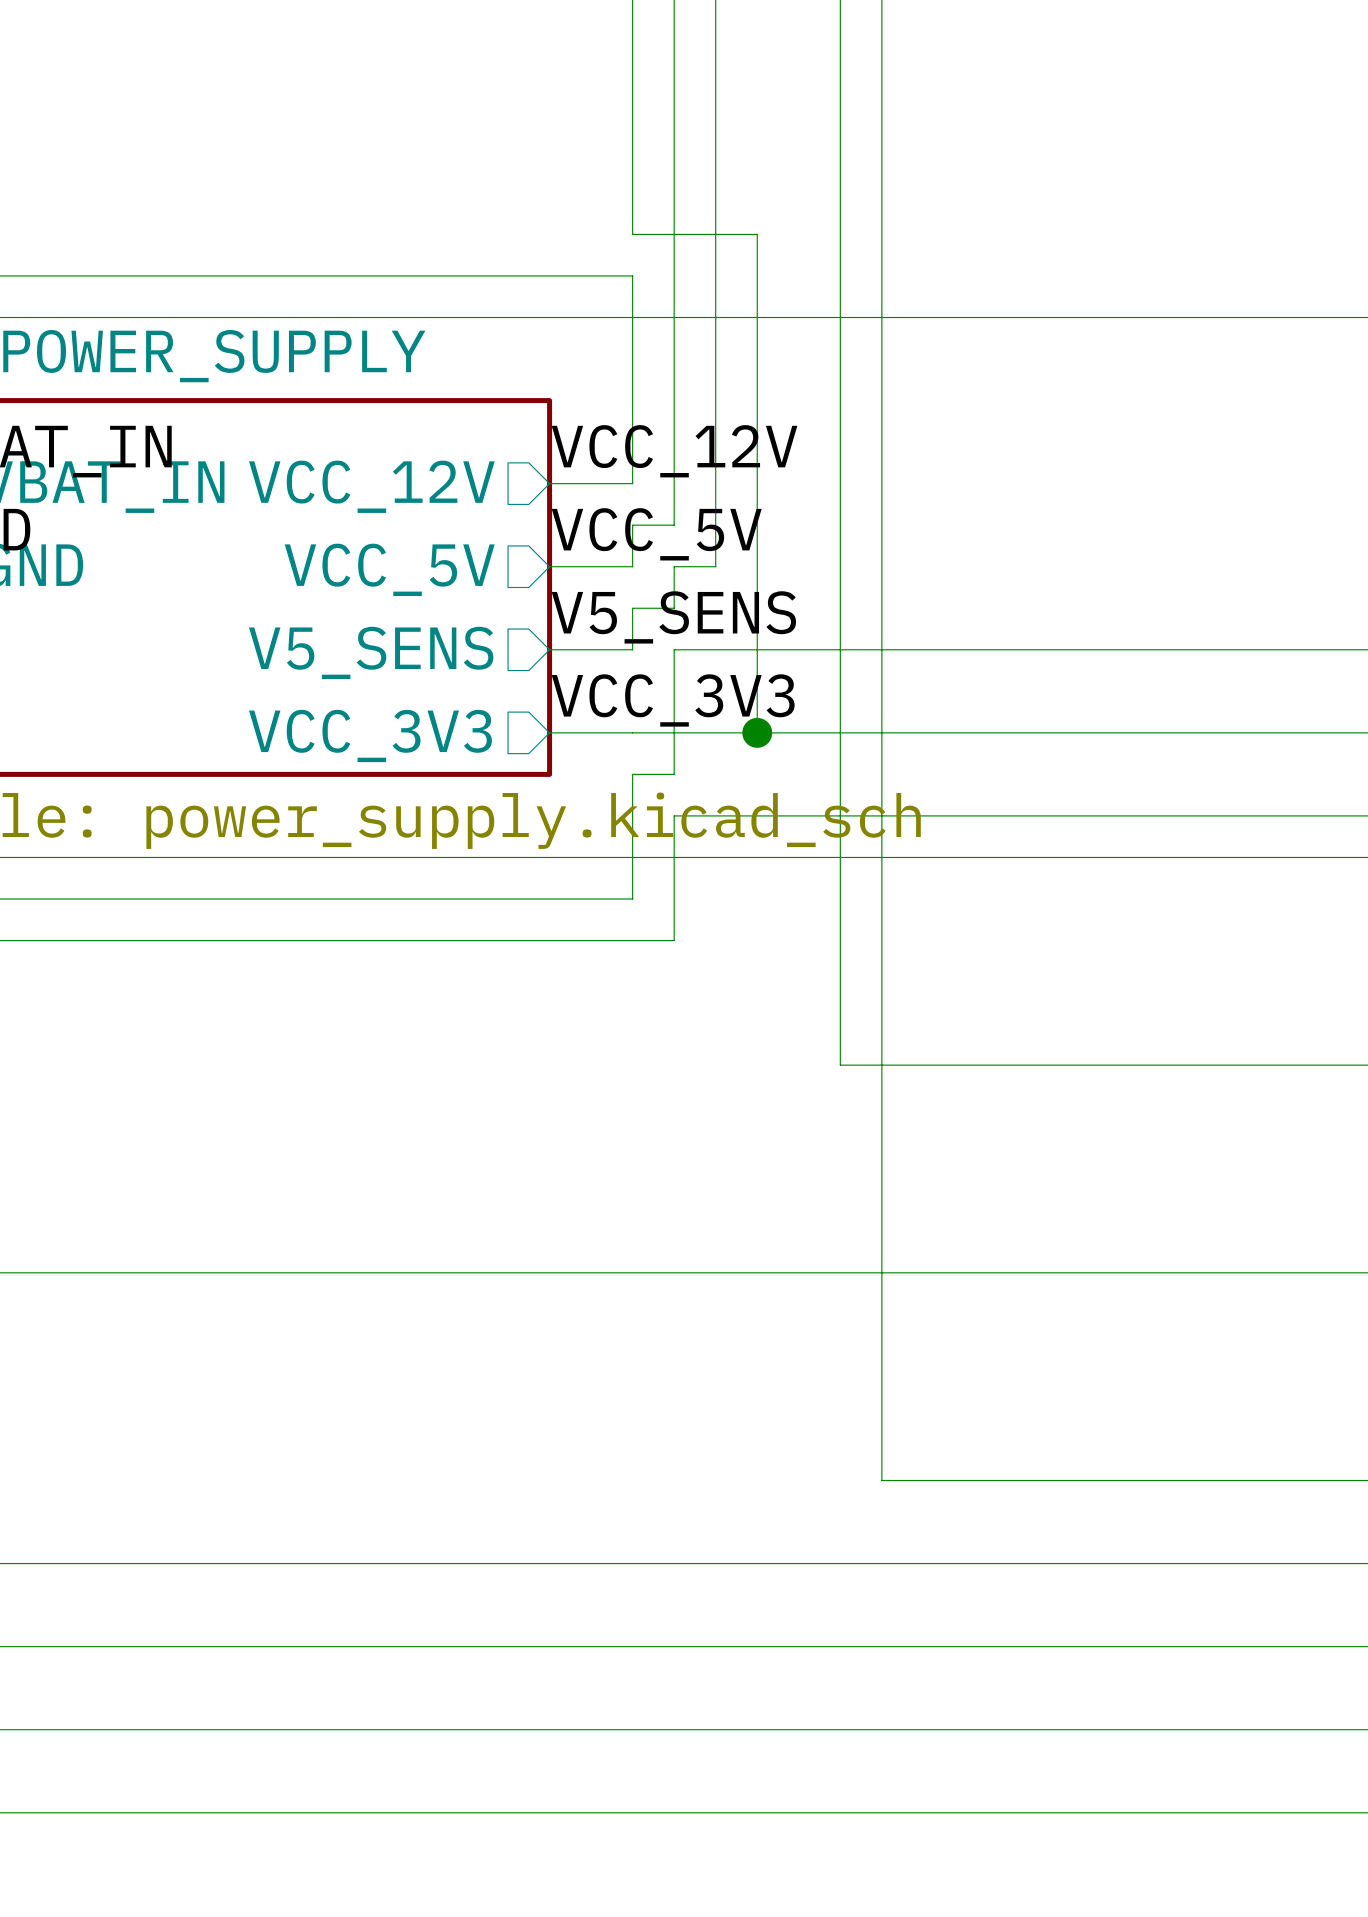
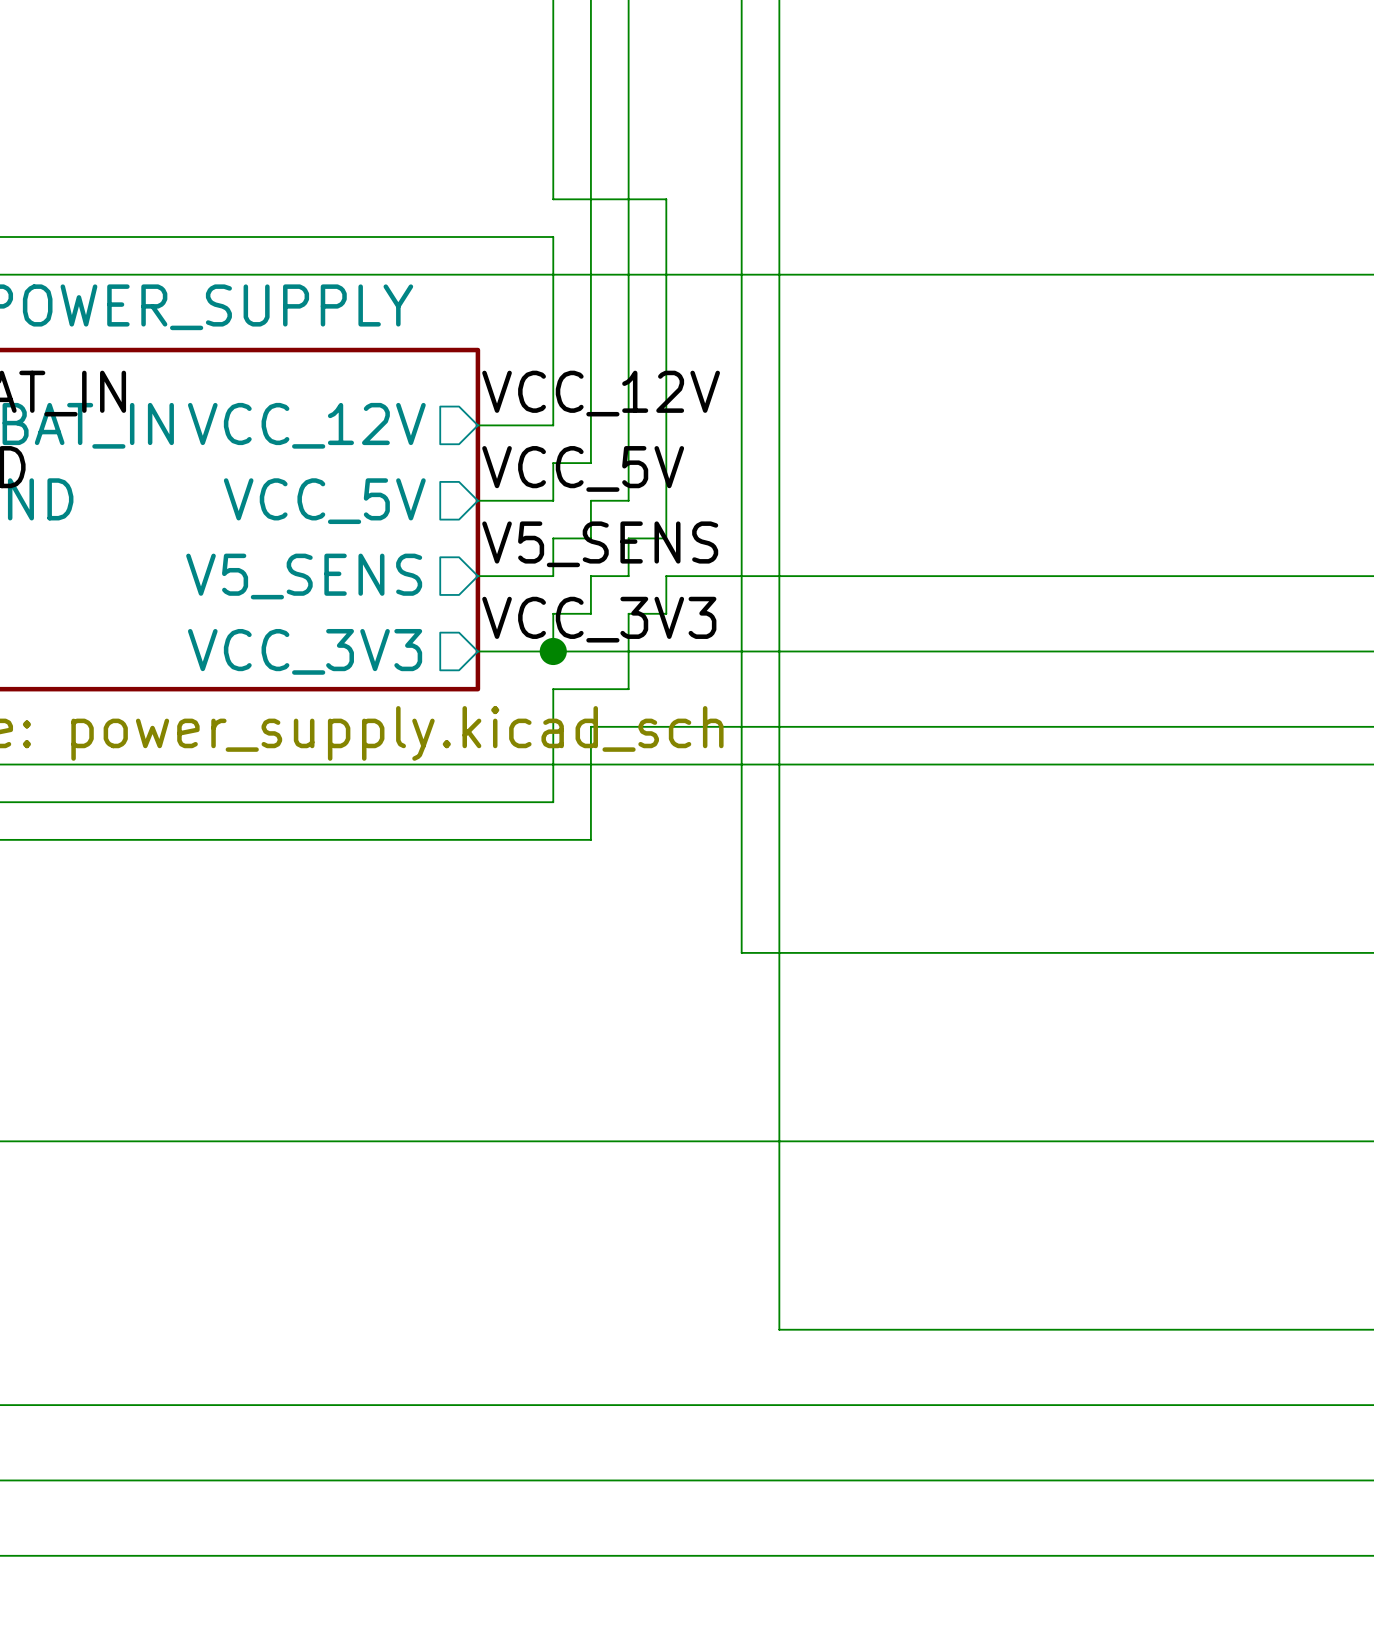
wire: (757, 608) (757, 649) (715, 649) -> (666, 538) (628, 538) (628, 576)
wire: (674, 691) (674, 774) -> (590, 613) (553, 613) (553, 651)
wire: (757, 691) (757, 732) -> (666, 613) (628, 613) (628, 689) (590, 689)
junction position: (757, 732) -> (553, 651)

